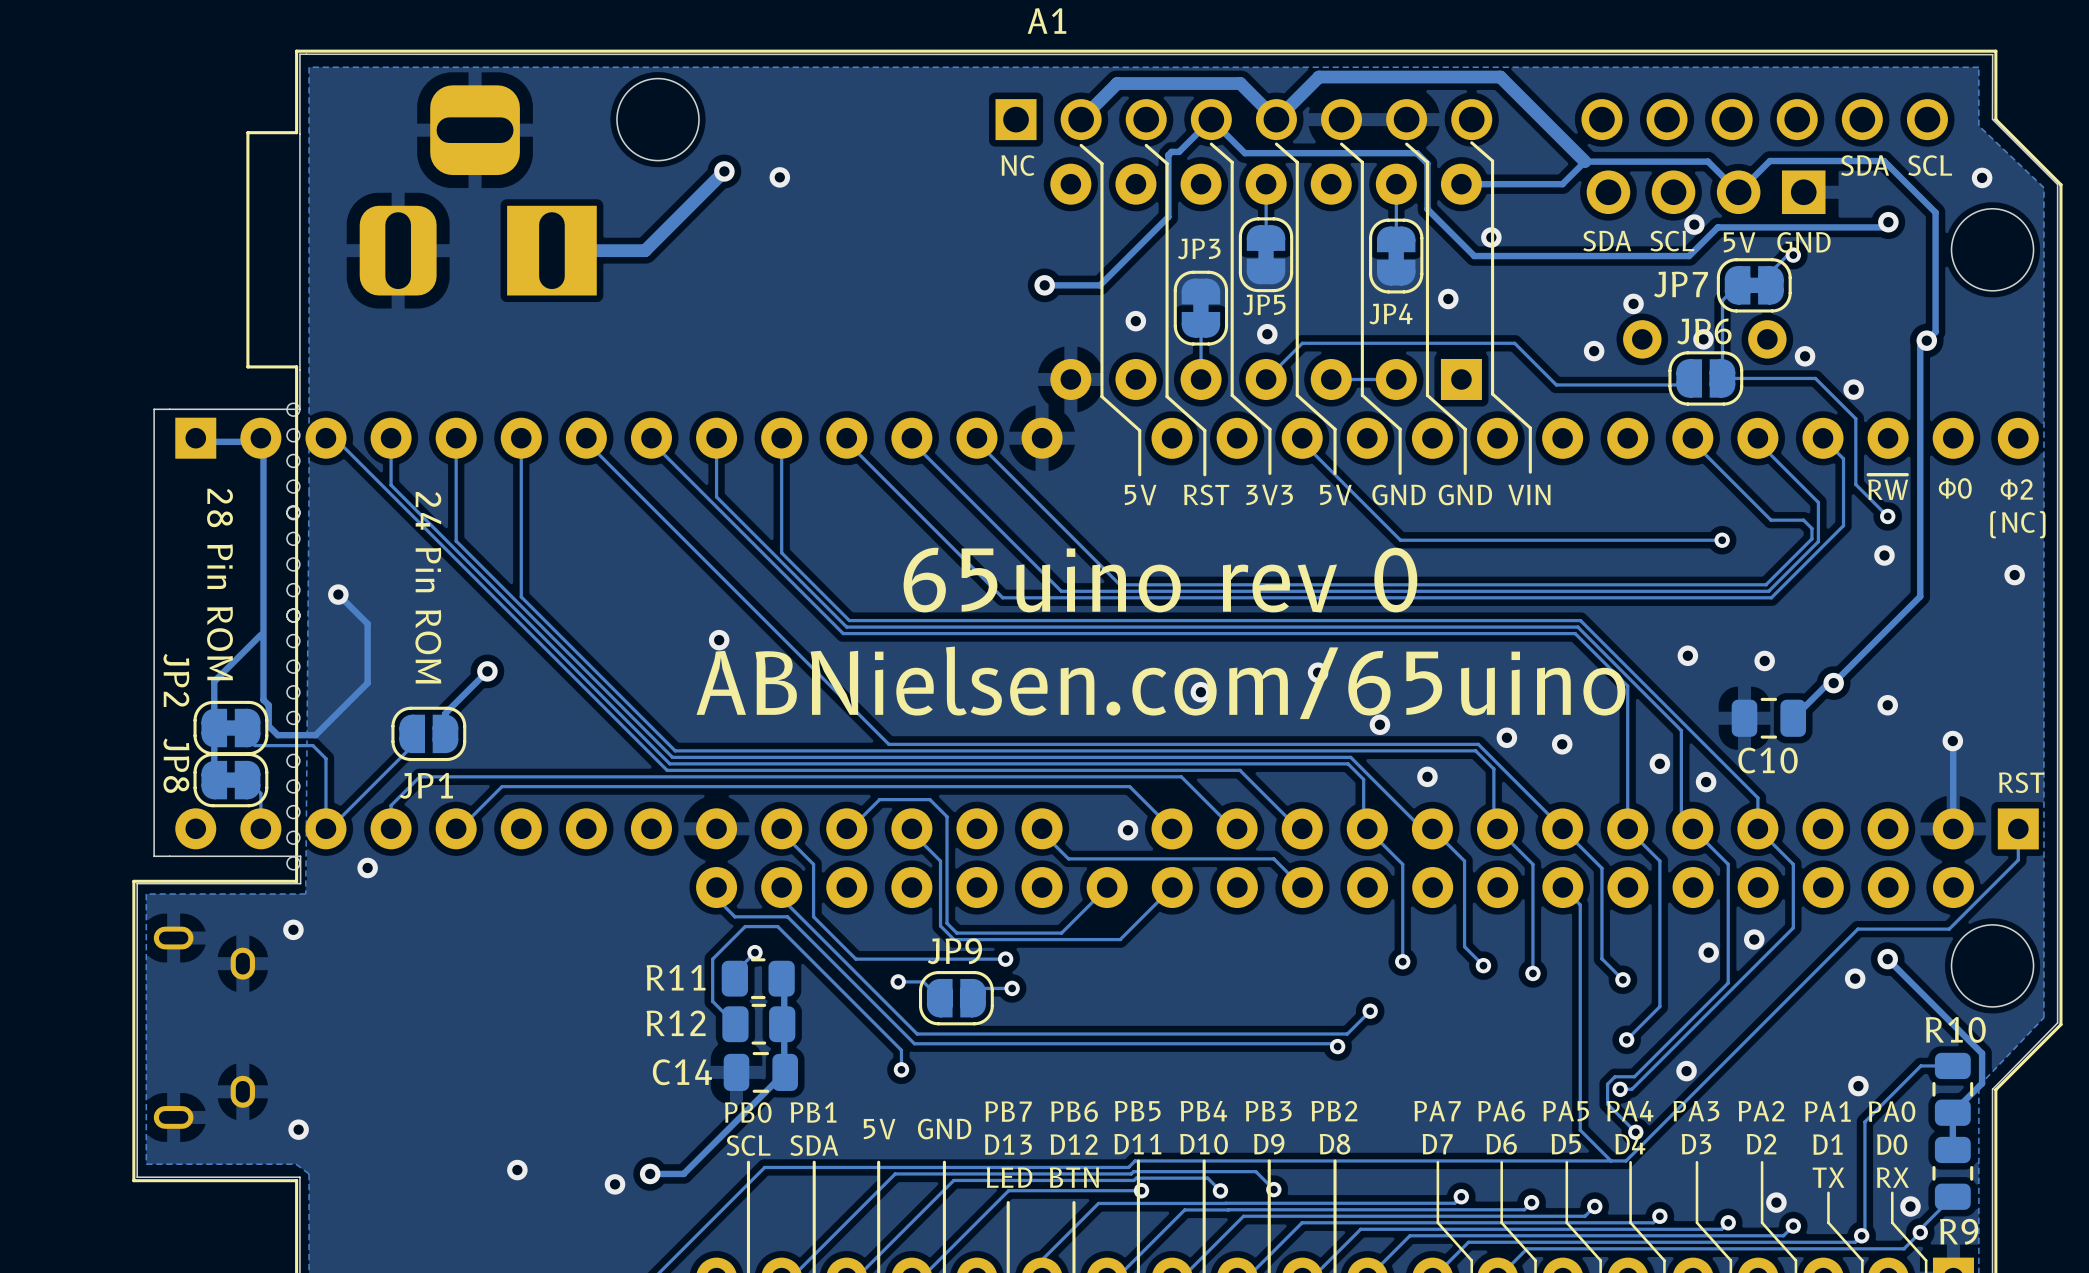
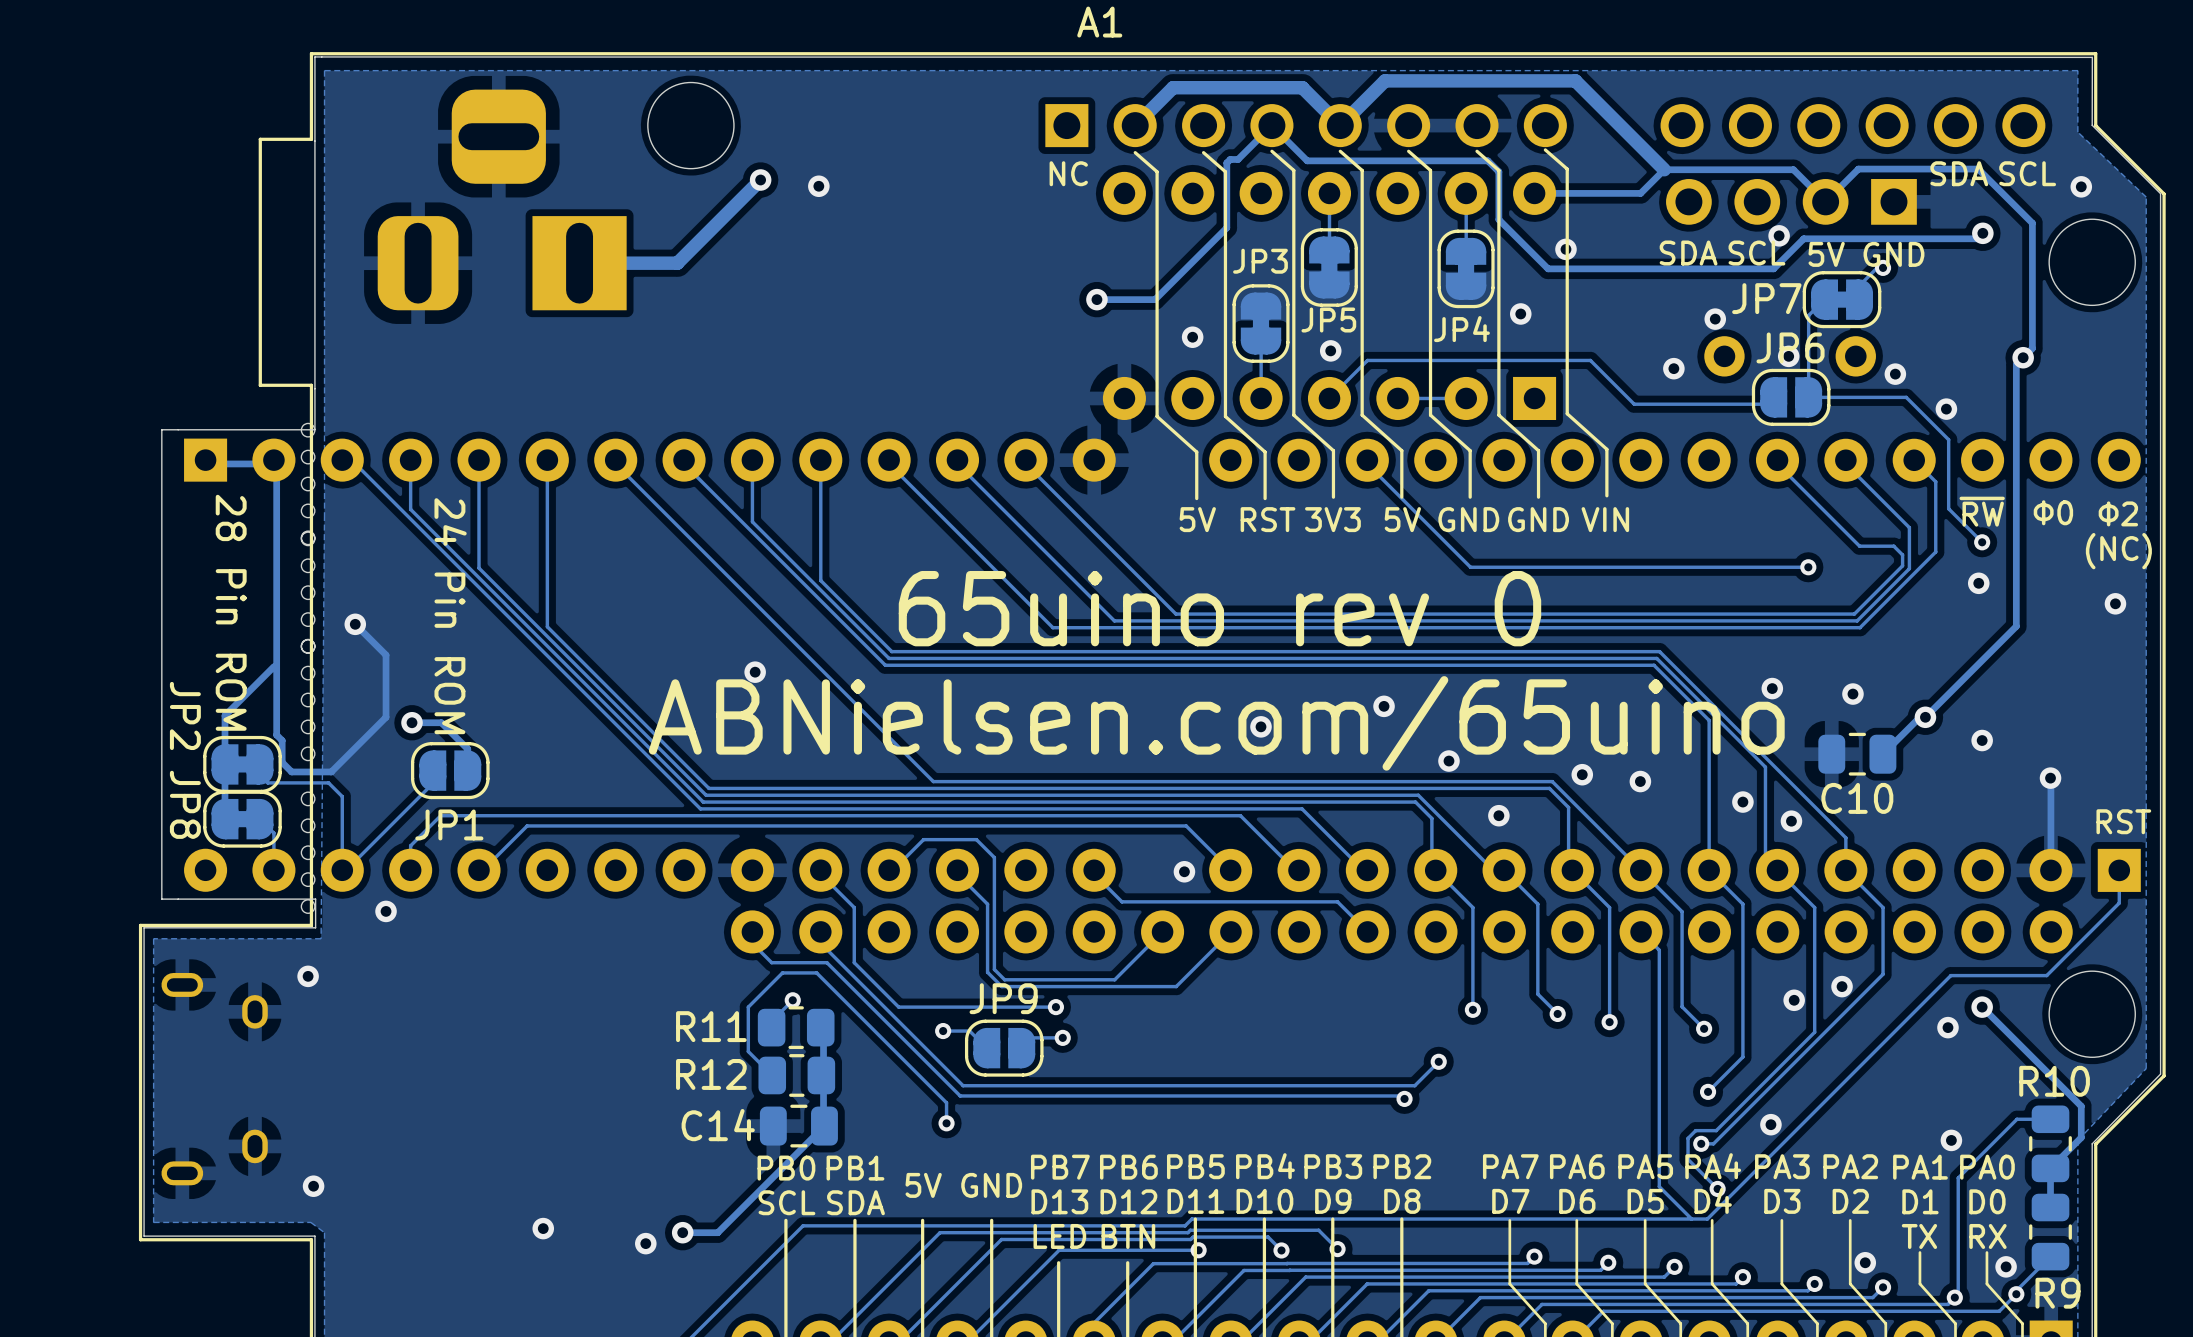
track: (487, 671) (445, 713) -> (412, 722) (441, 722) (467, 749)
via position: (487, 671) -> (412, 722)

